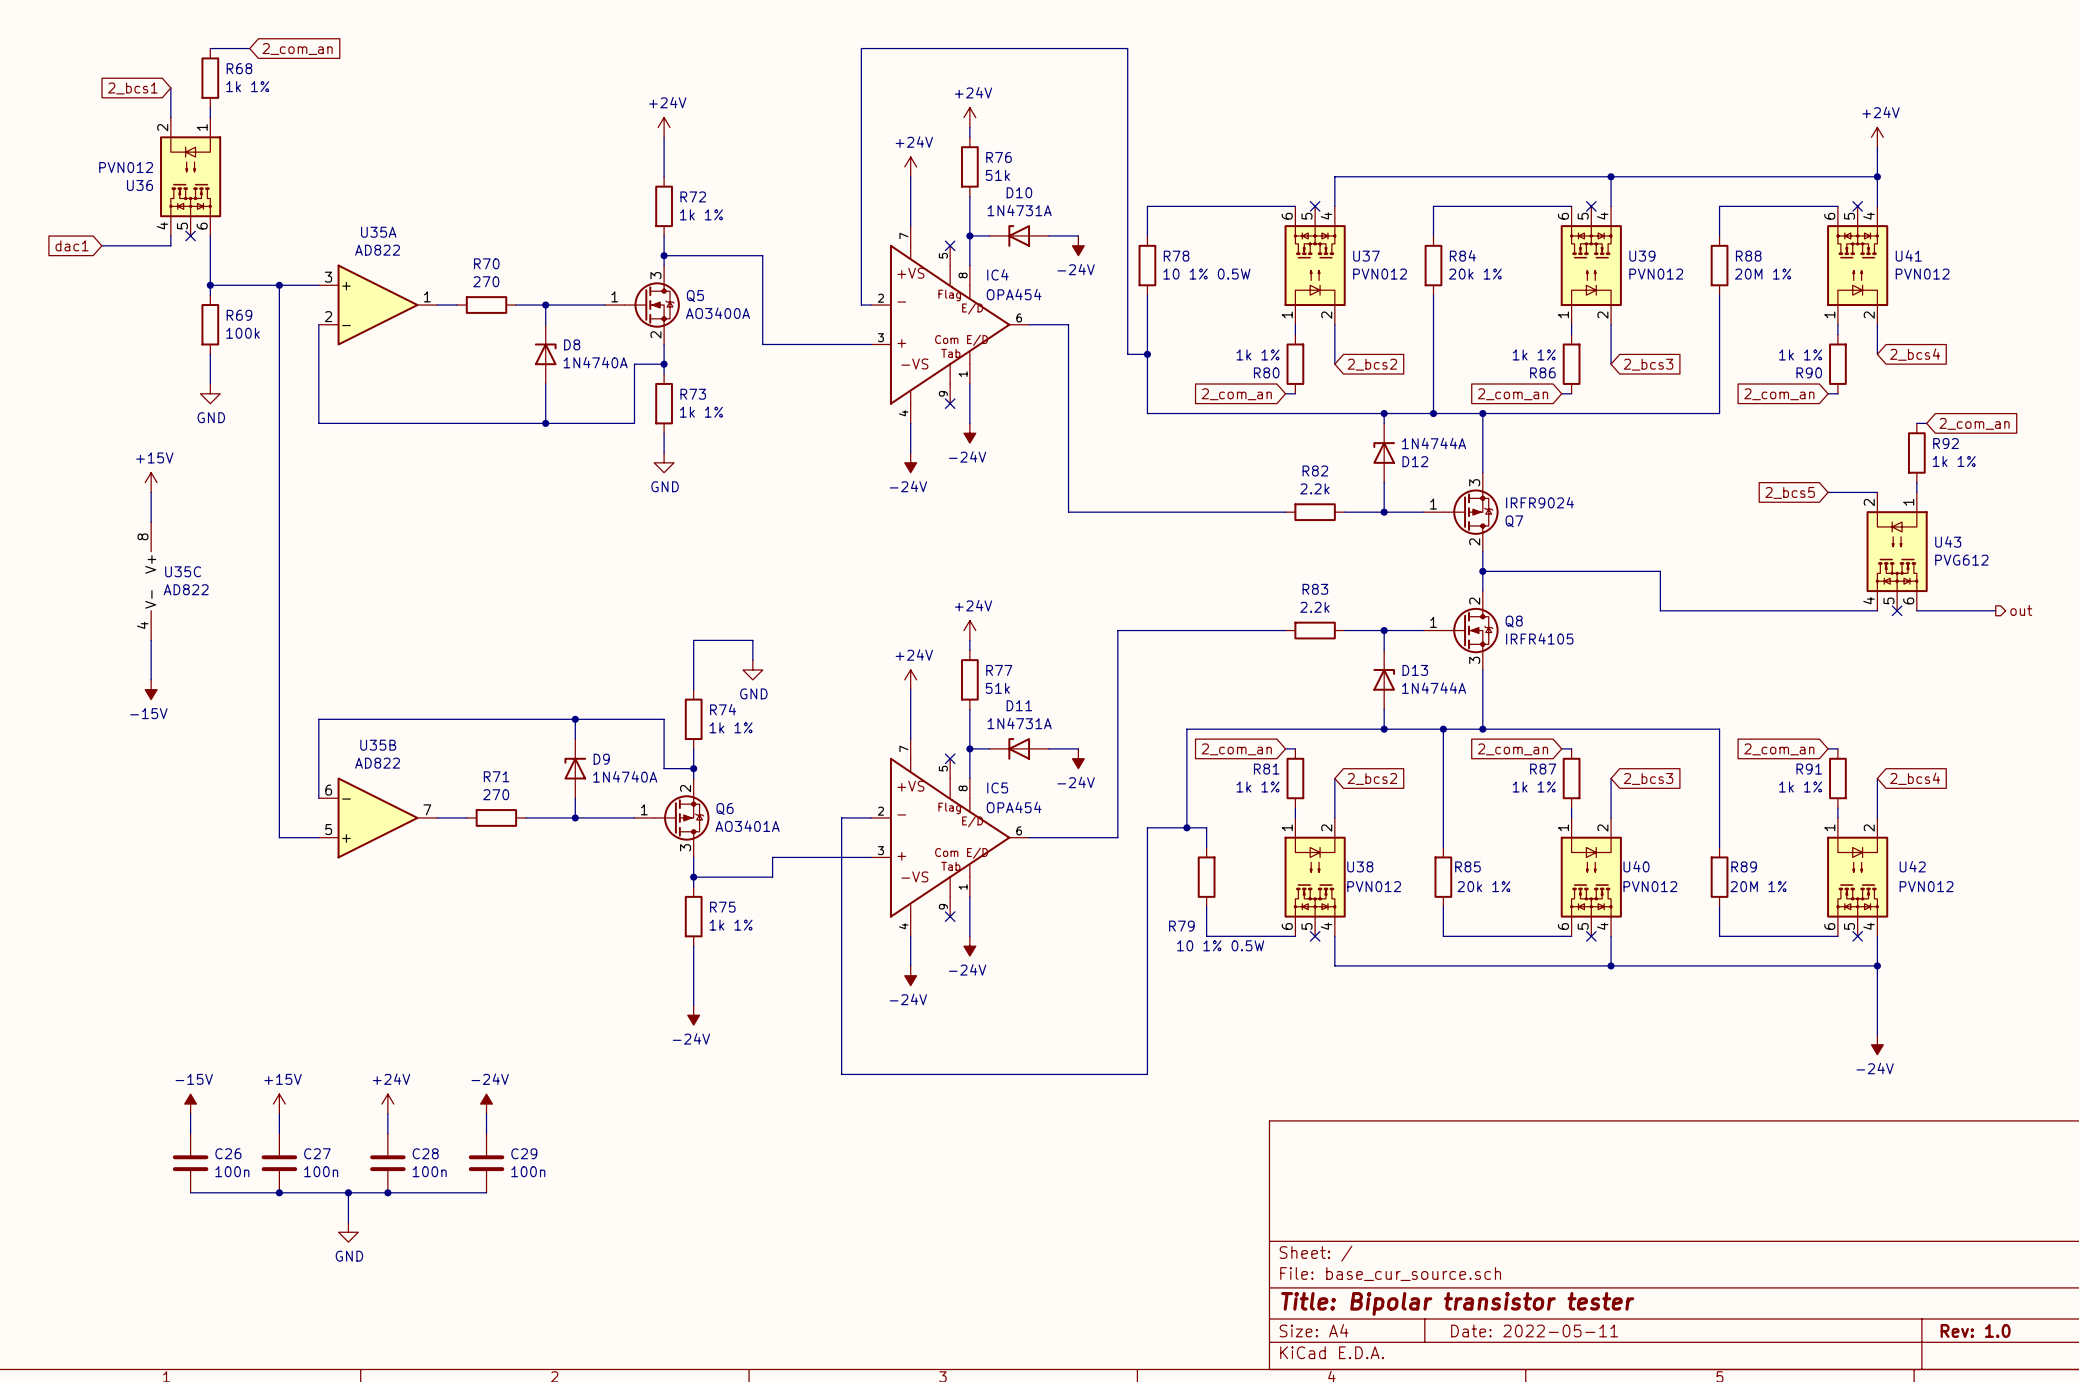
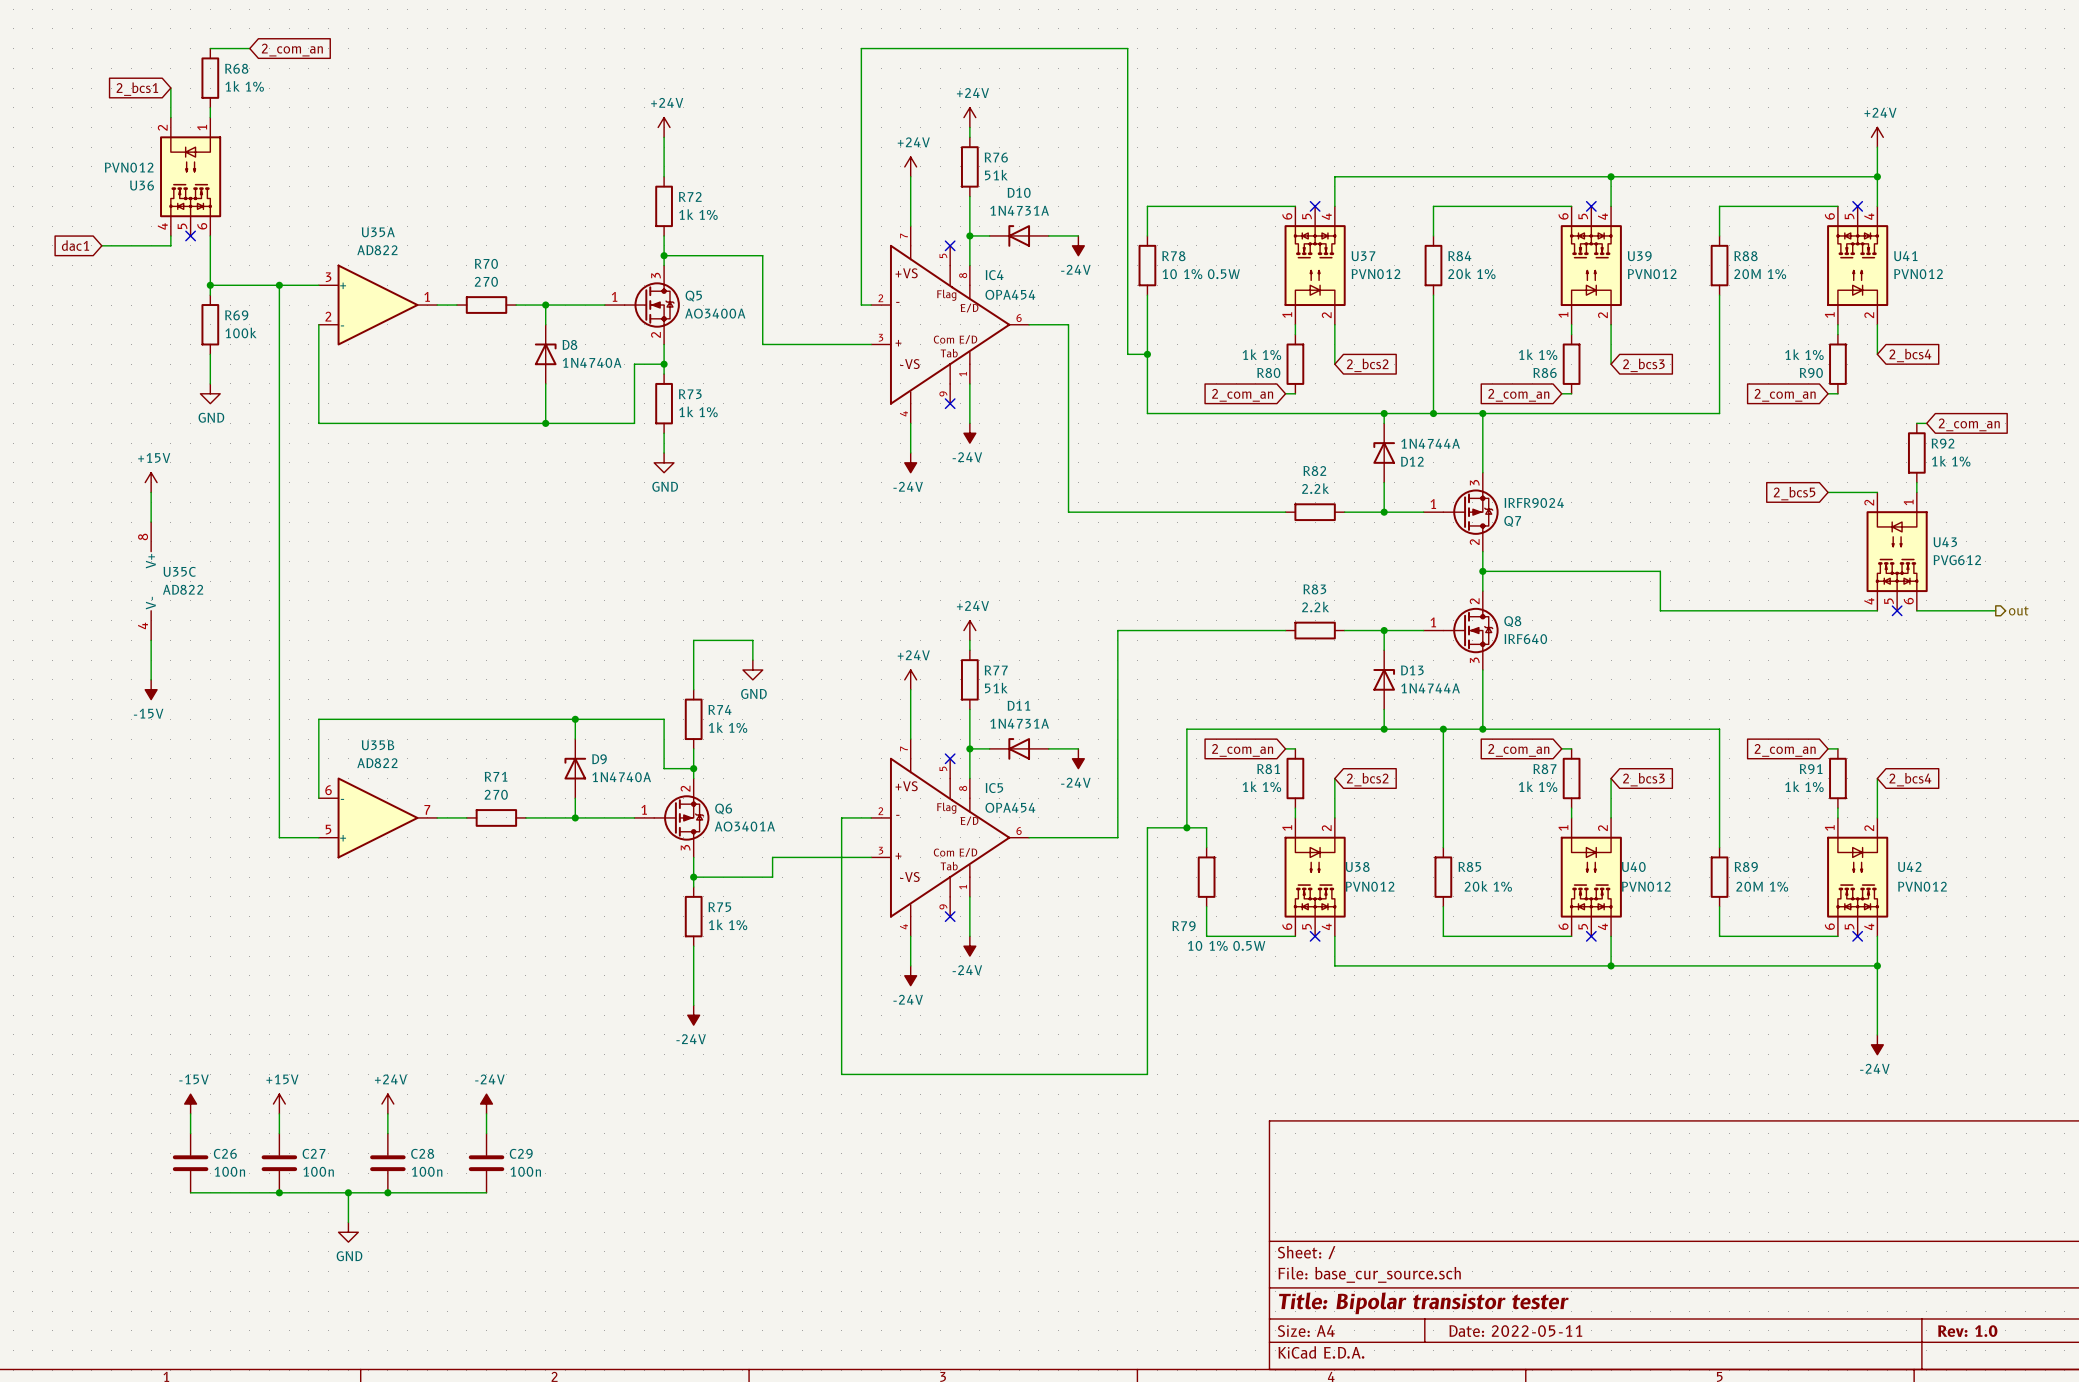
Q8 value: IRFR4105 (1539, 638) -> IRF640 (1525, 639)

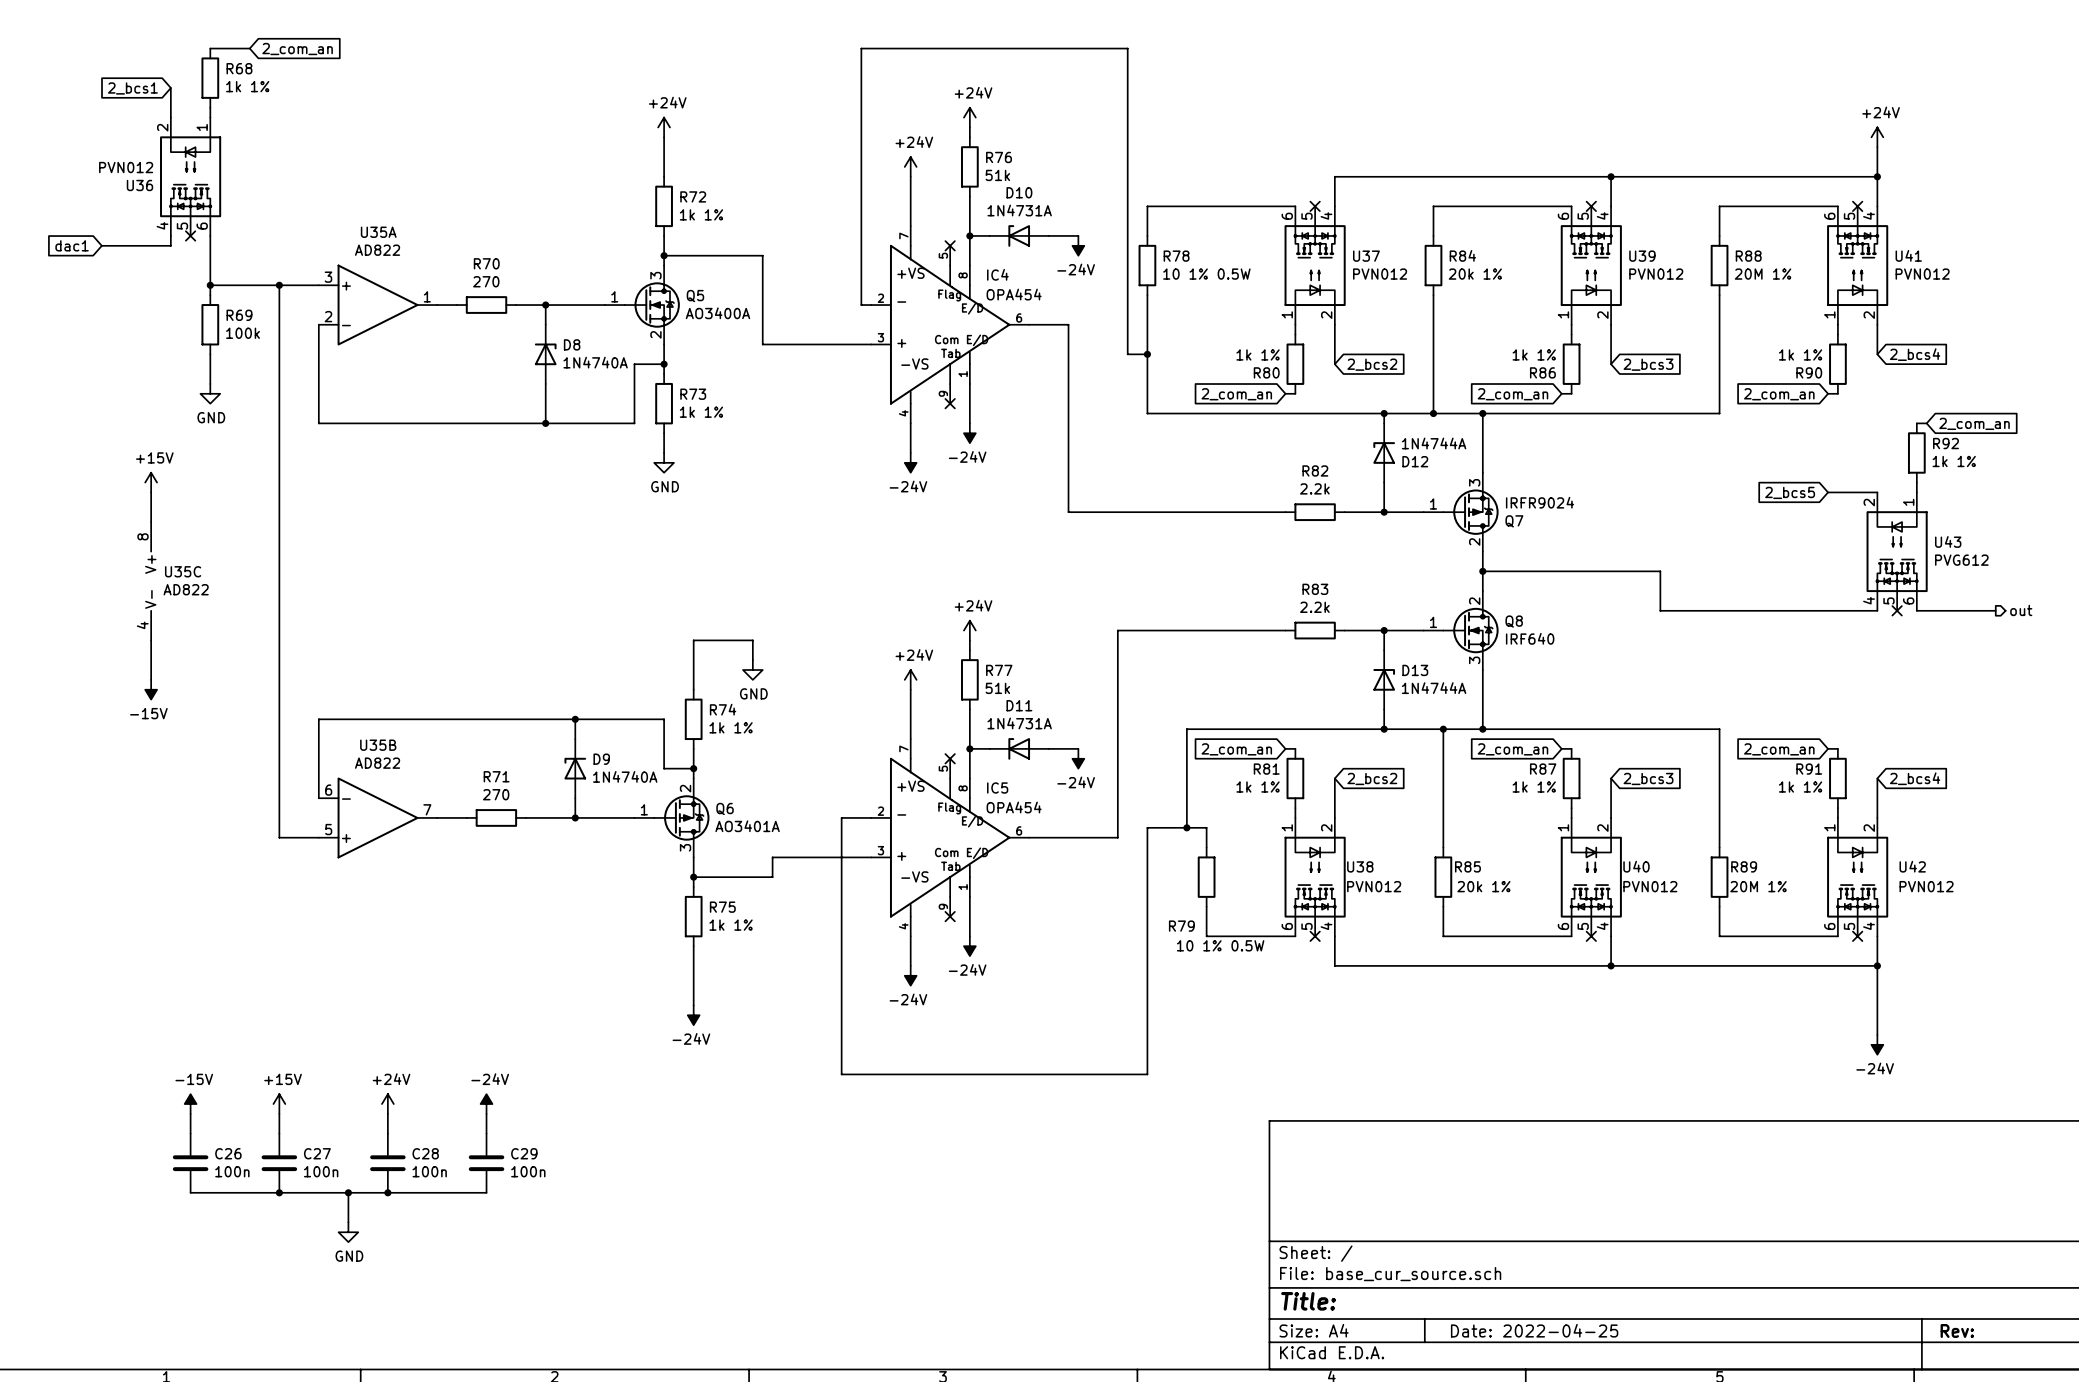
title block: Title: Bipolar transistor tester (1423, 1303) -> Title: (1308, 1301)
title block: Date: 2022-05-11 (1515, 1331) -> Date: 2022-04-25 (1534, 1330)
title block: Rev: 1.0 (1967, 1331) -> Rev: (1957, 1330)

